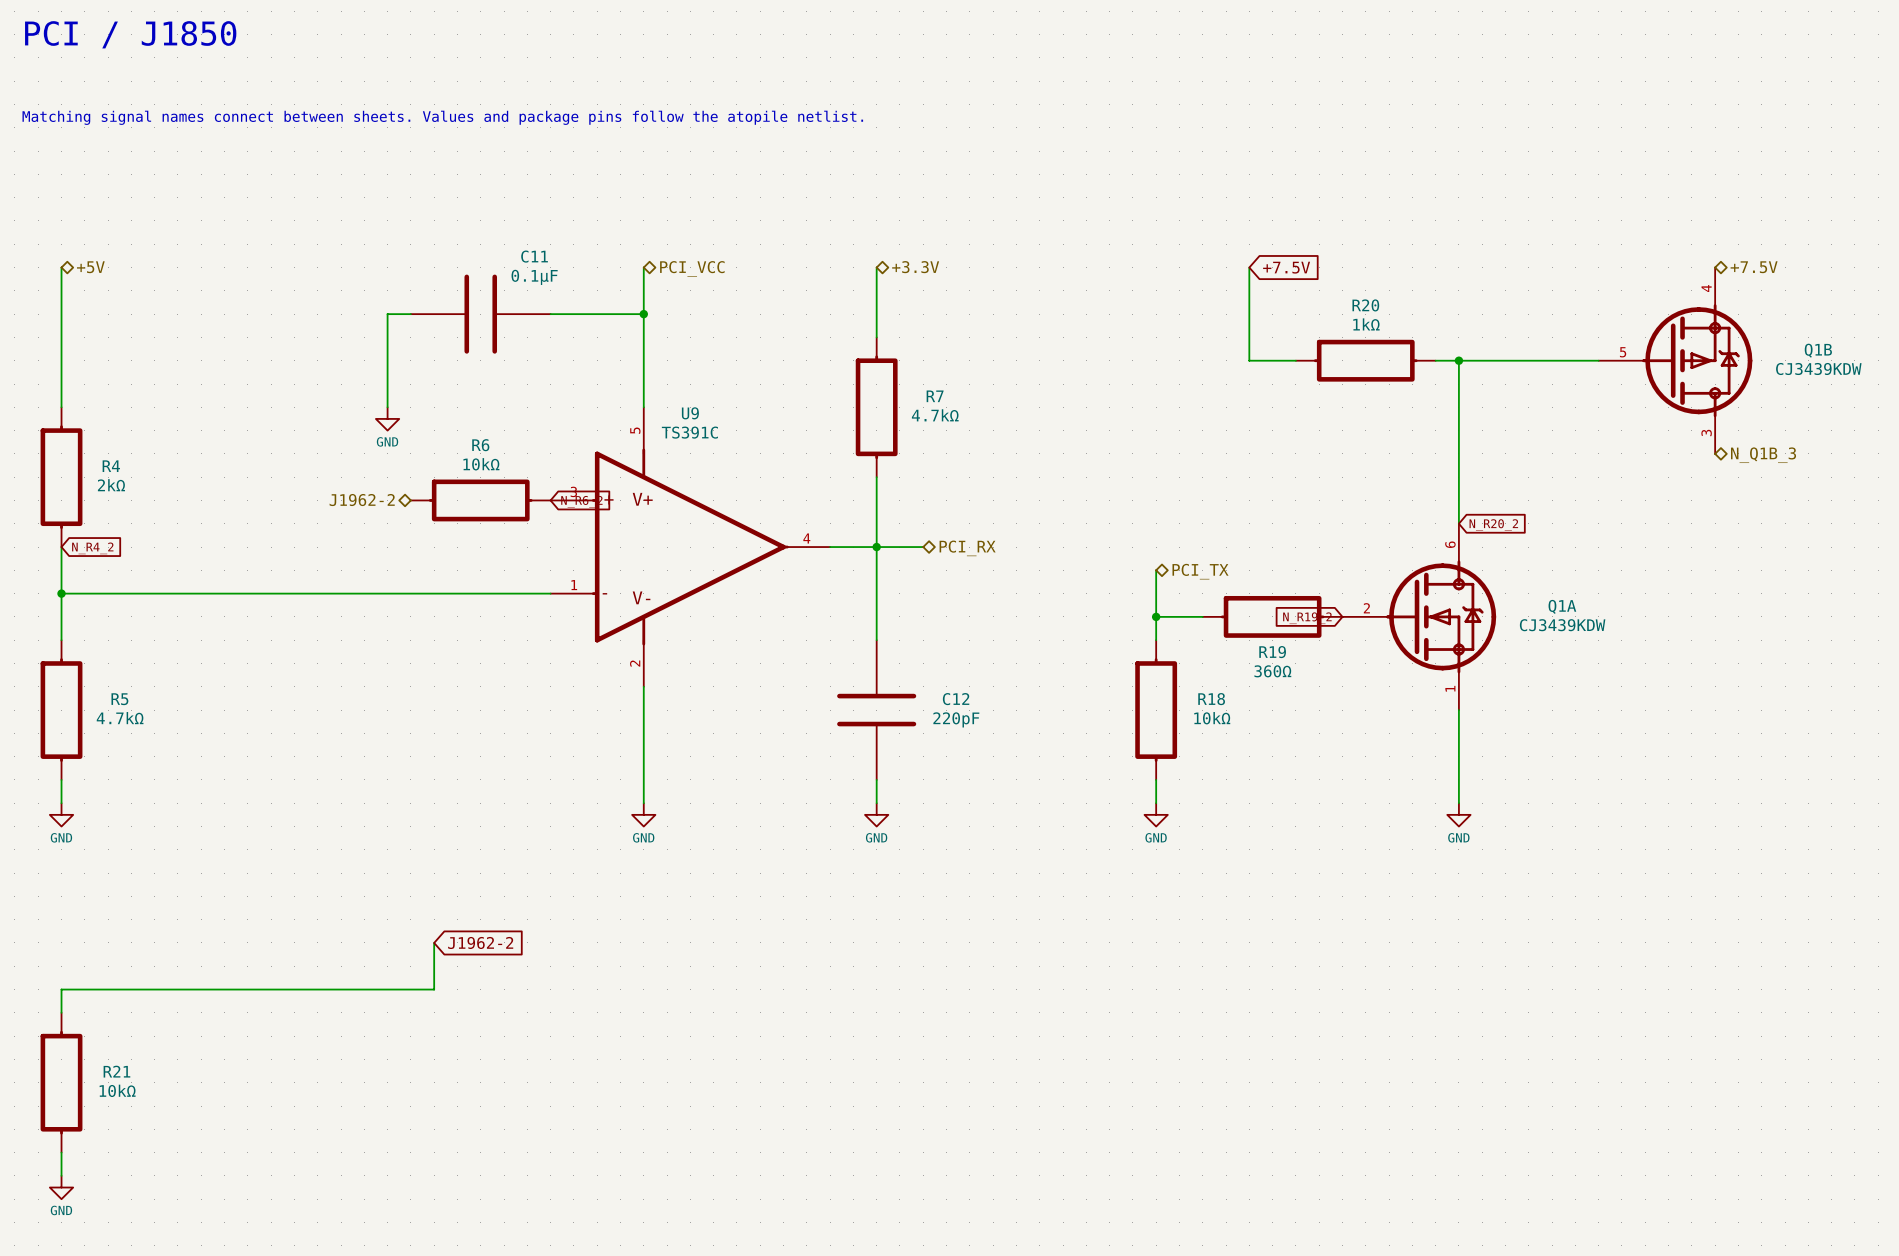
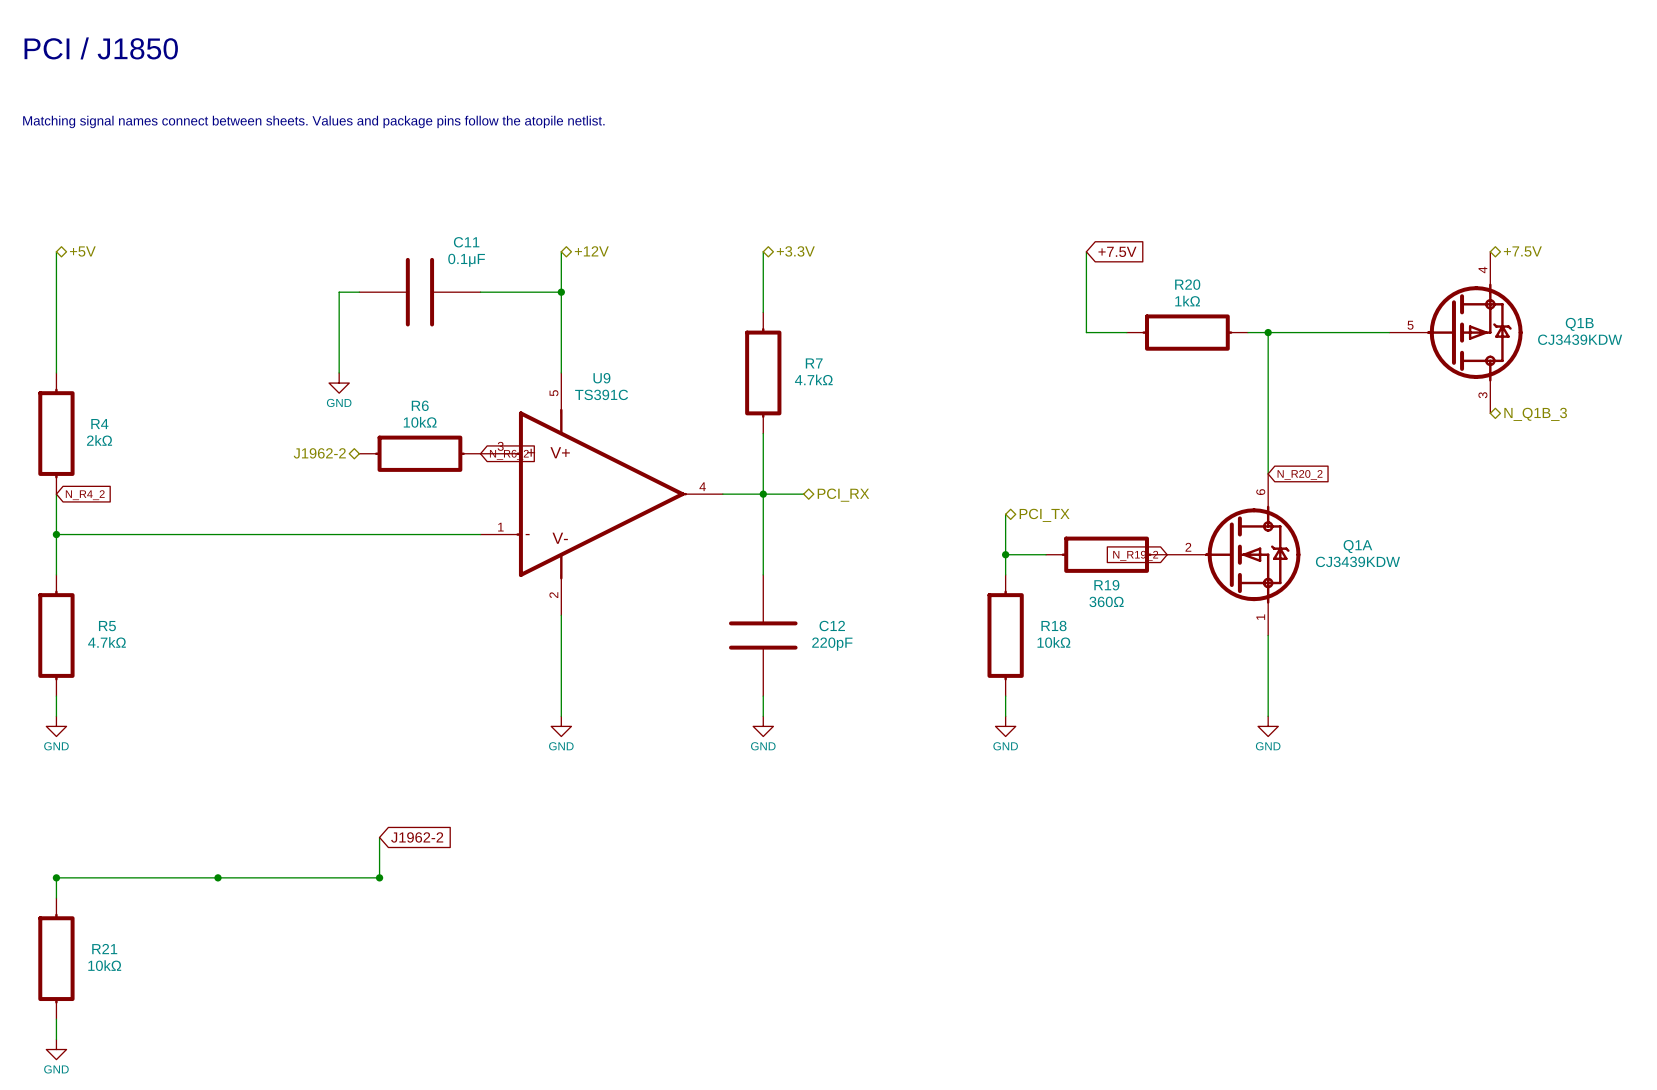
hierarchical label: PCI_VCC (692, 268) -> +12V (591, 251)
junction: none -> (56, 877)
junction: none -> (218, 877)
junction: none -> (379, 877)

